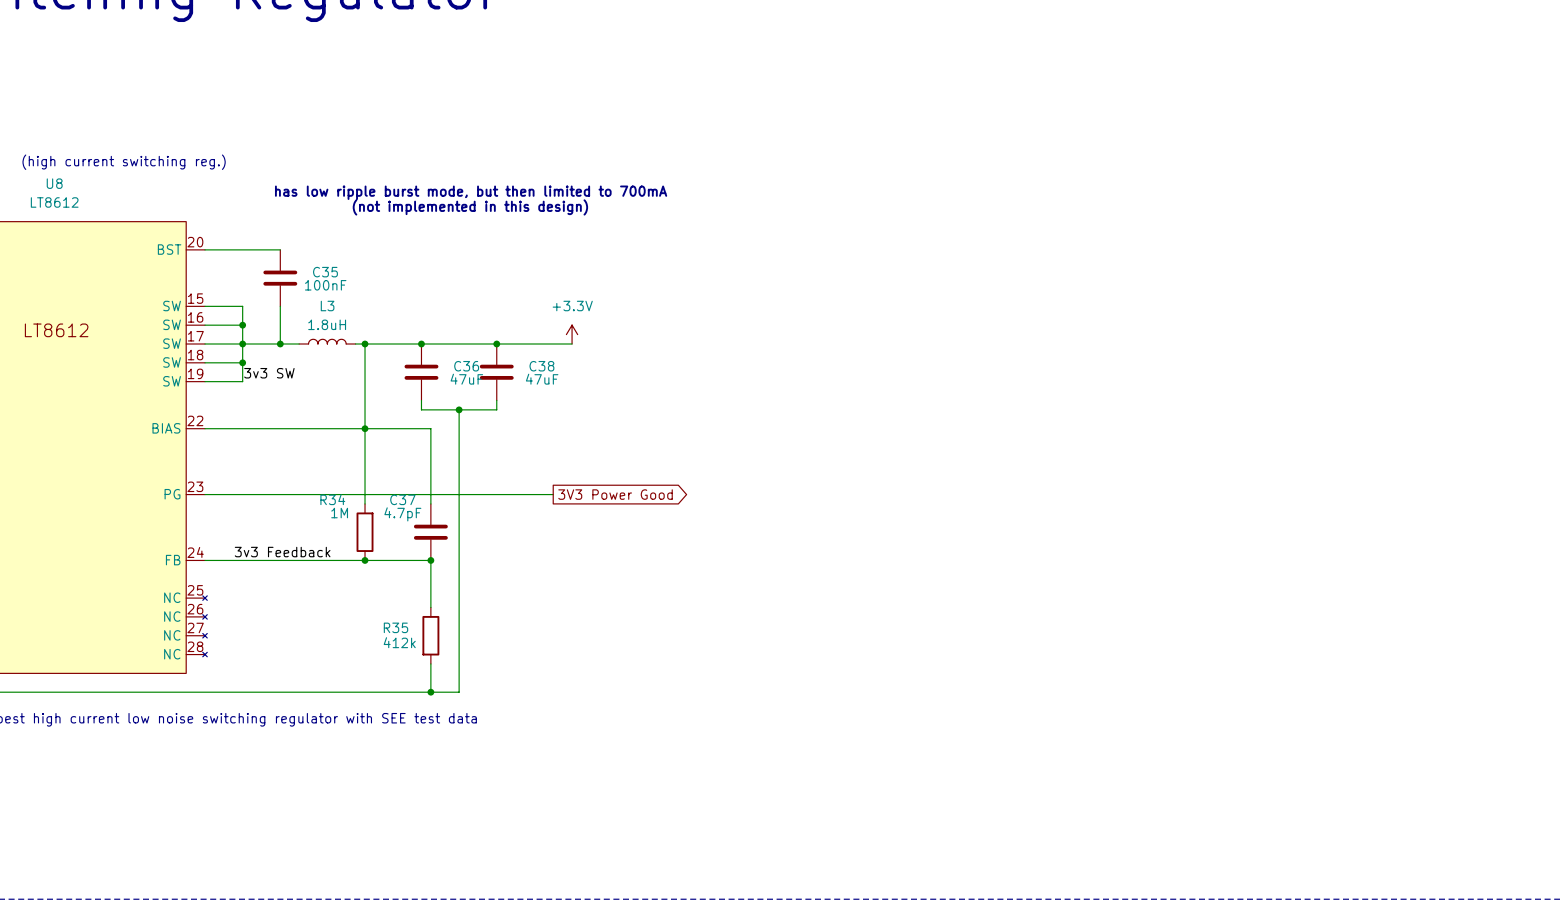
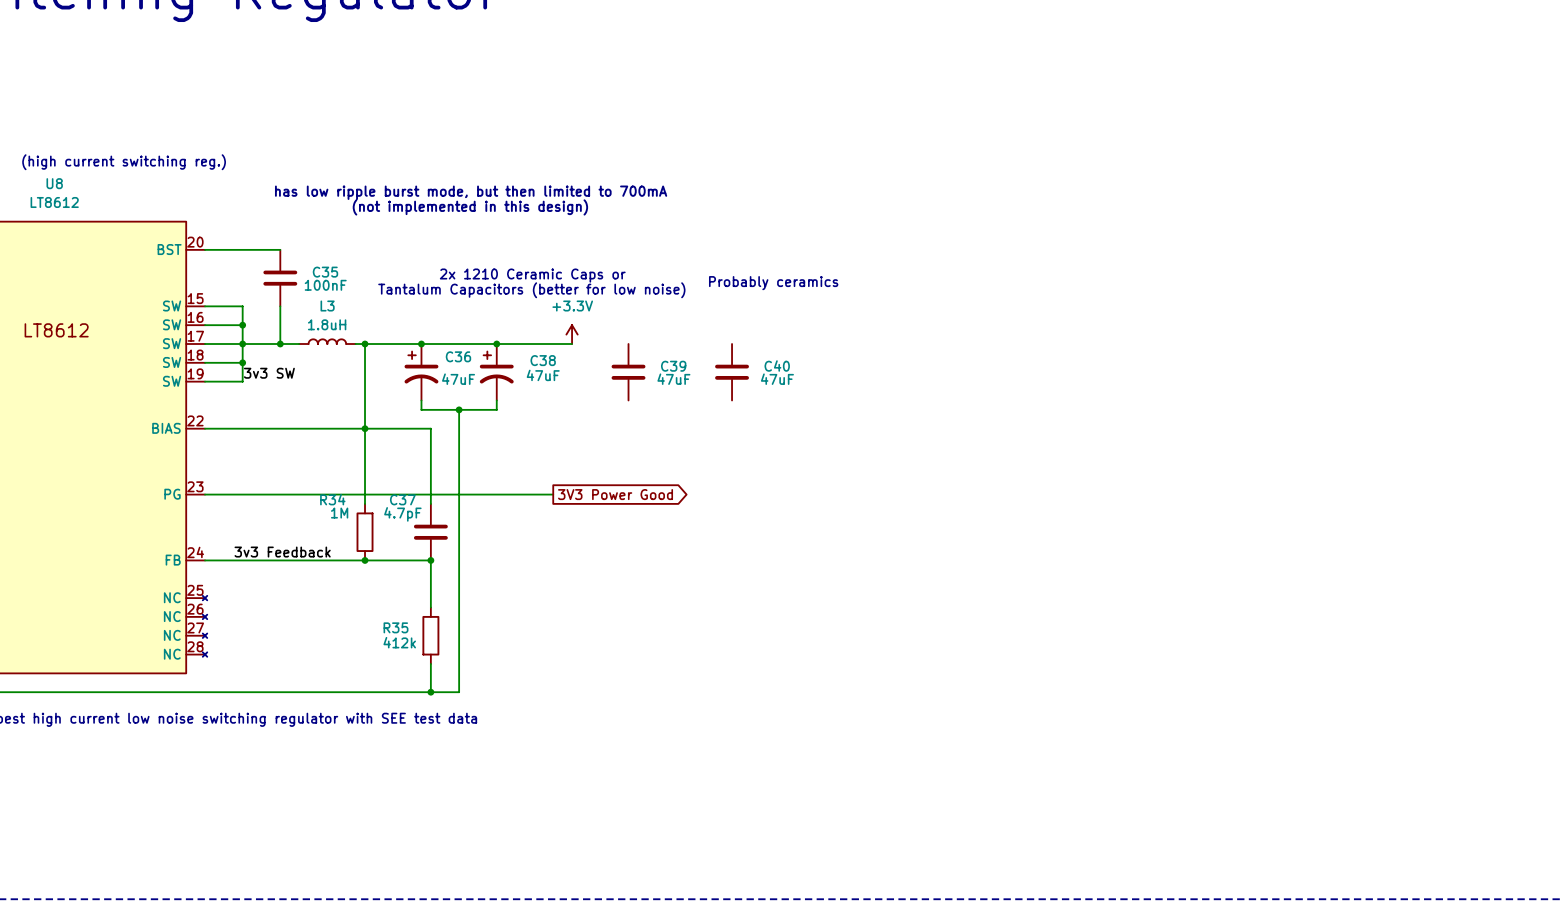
text: none -> 2x 1210 Ceramic Caps or (532, 275)
text: none -> Probably ceramics (773, 283)
text: none -> Tantalum Capacitors (better for low noise) (531, 290)
C36 symbol: [404, 344, 439, 401] -> [404, 344, 439, 401]
C38 symbol: [479, 344, 514, 401] -> [479, 344, 514, 401]
C39: none -> 47uF (628, 372)
C40: none -> 47uF (732, 372)

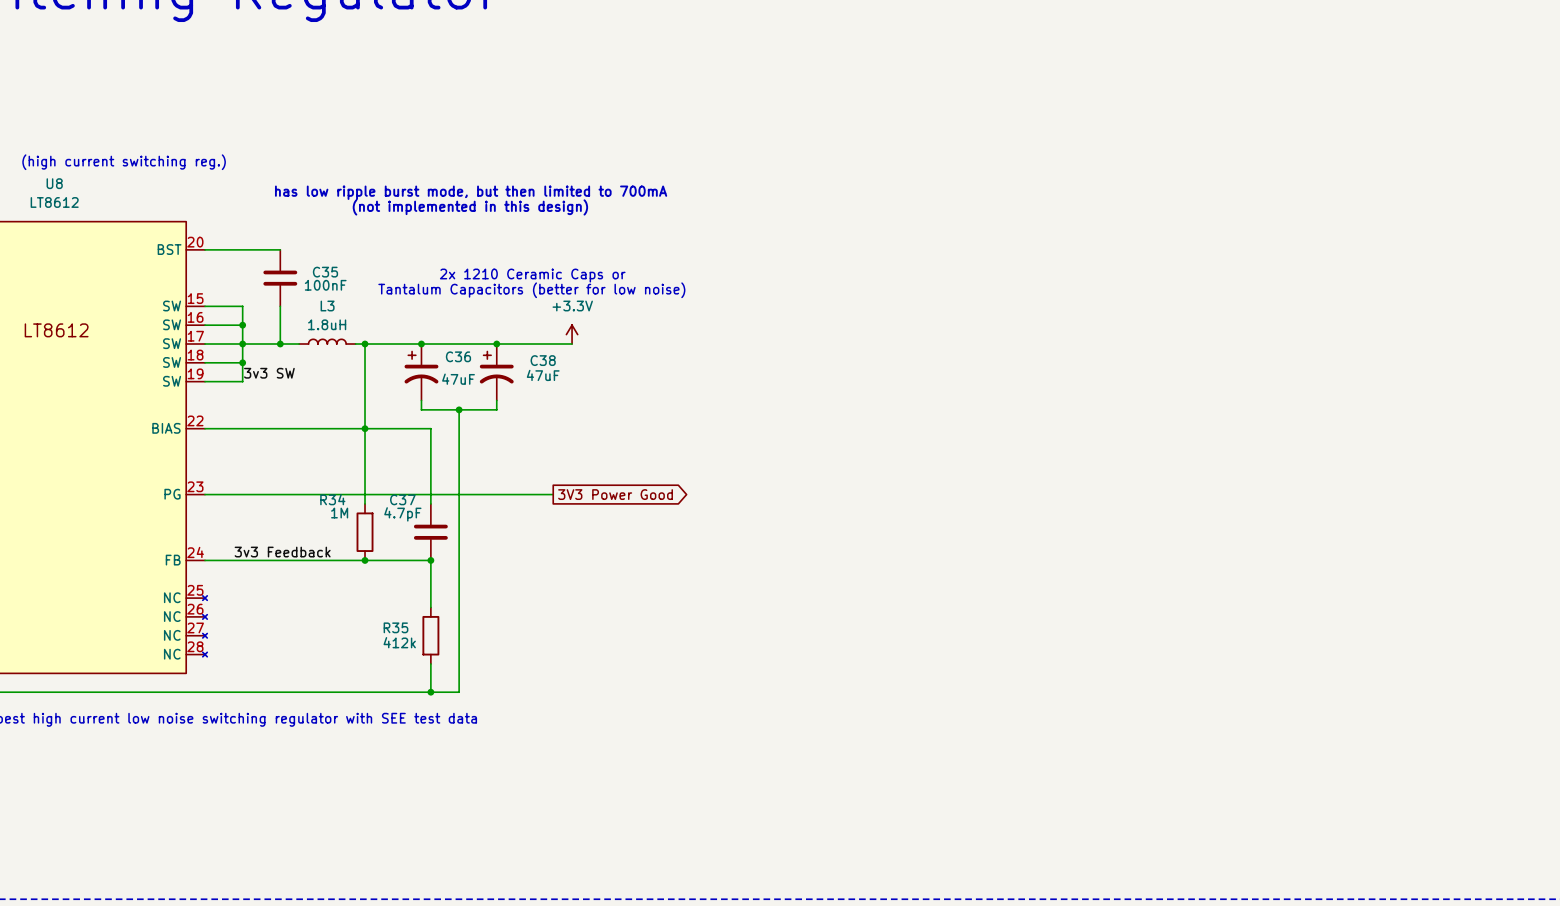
text: Probably ceramics (773, 283) -> none
C39: 47uF (628, 372) -> none
C40: 47uF (732, 372) -> none

